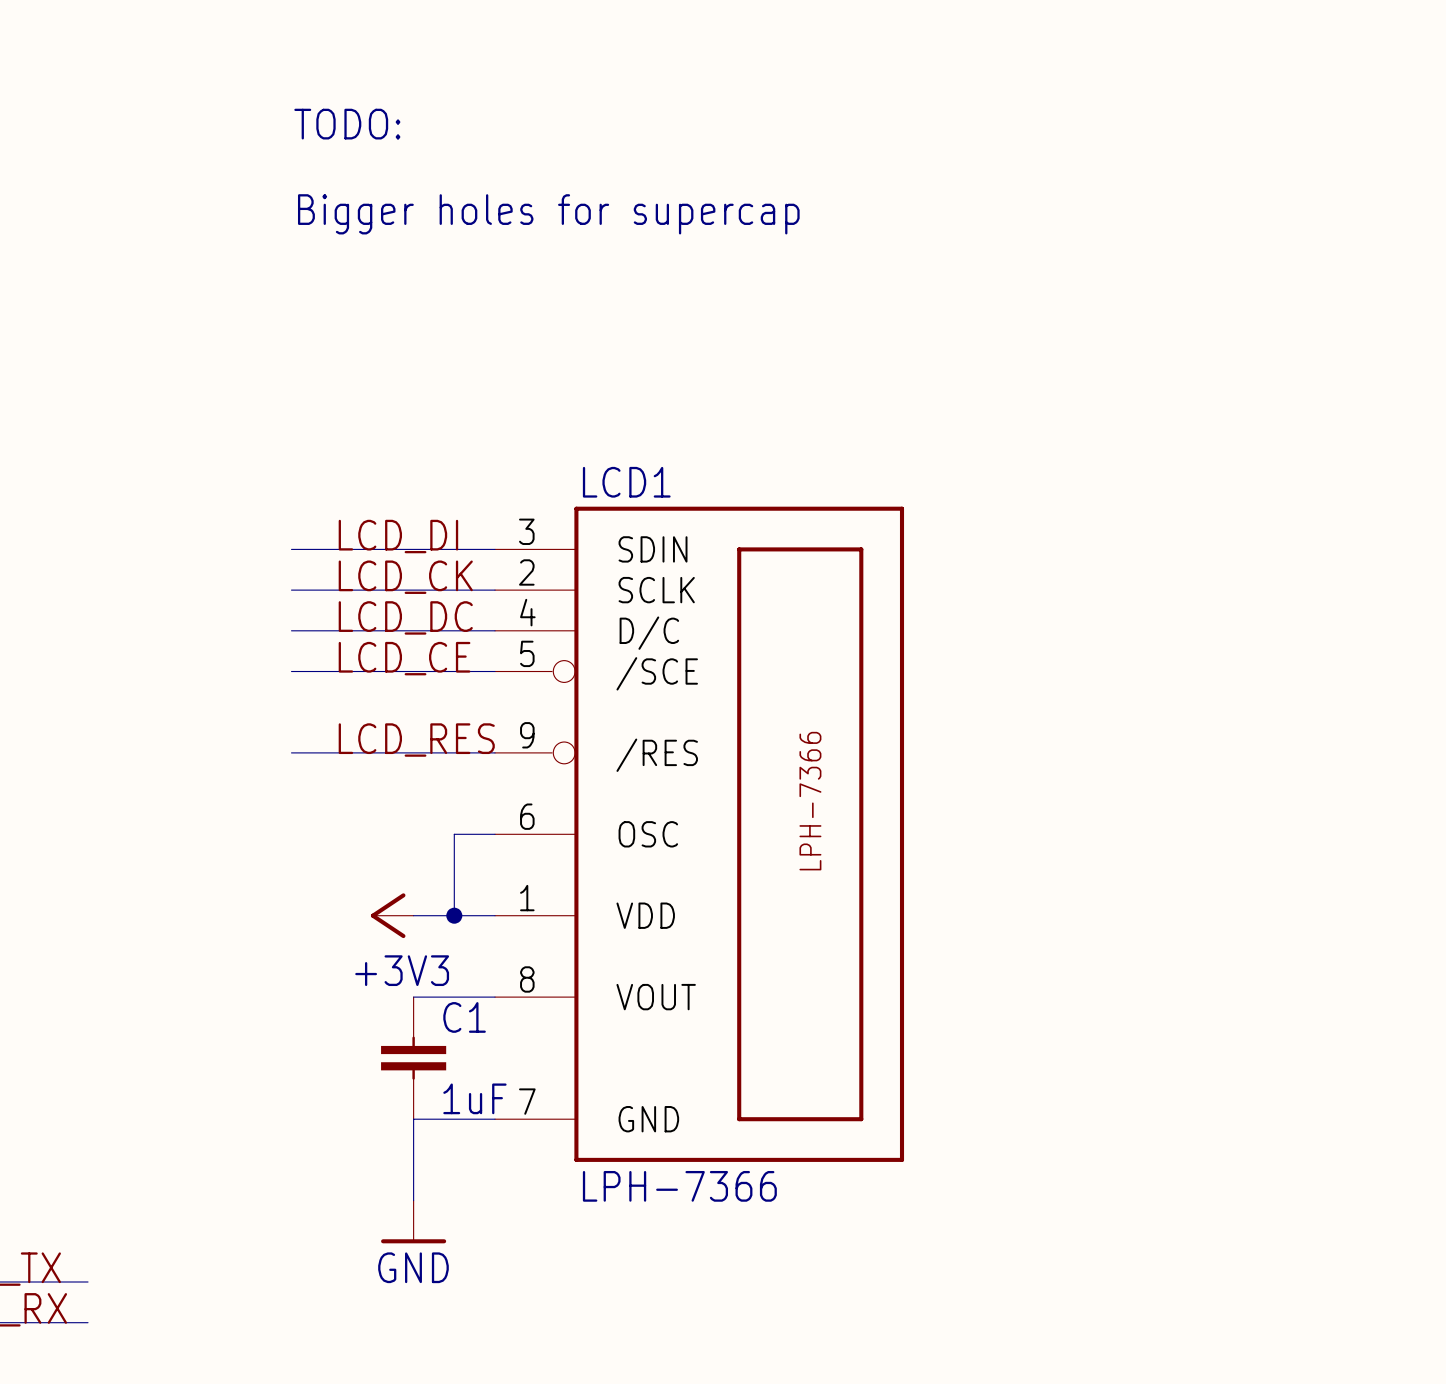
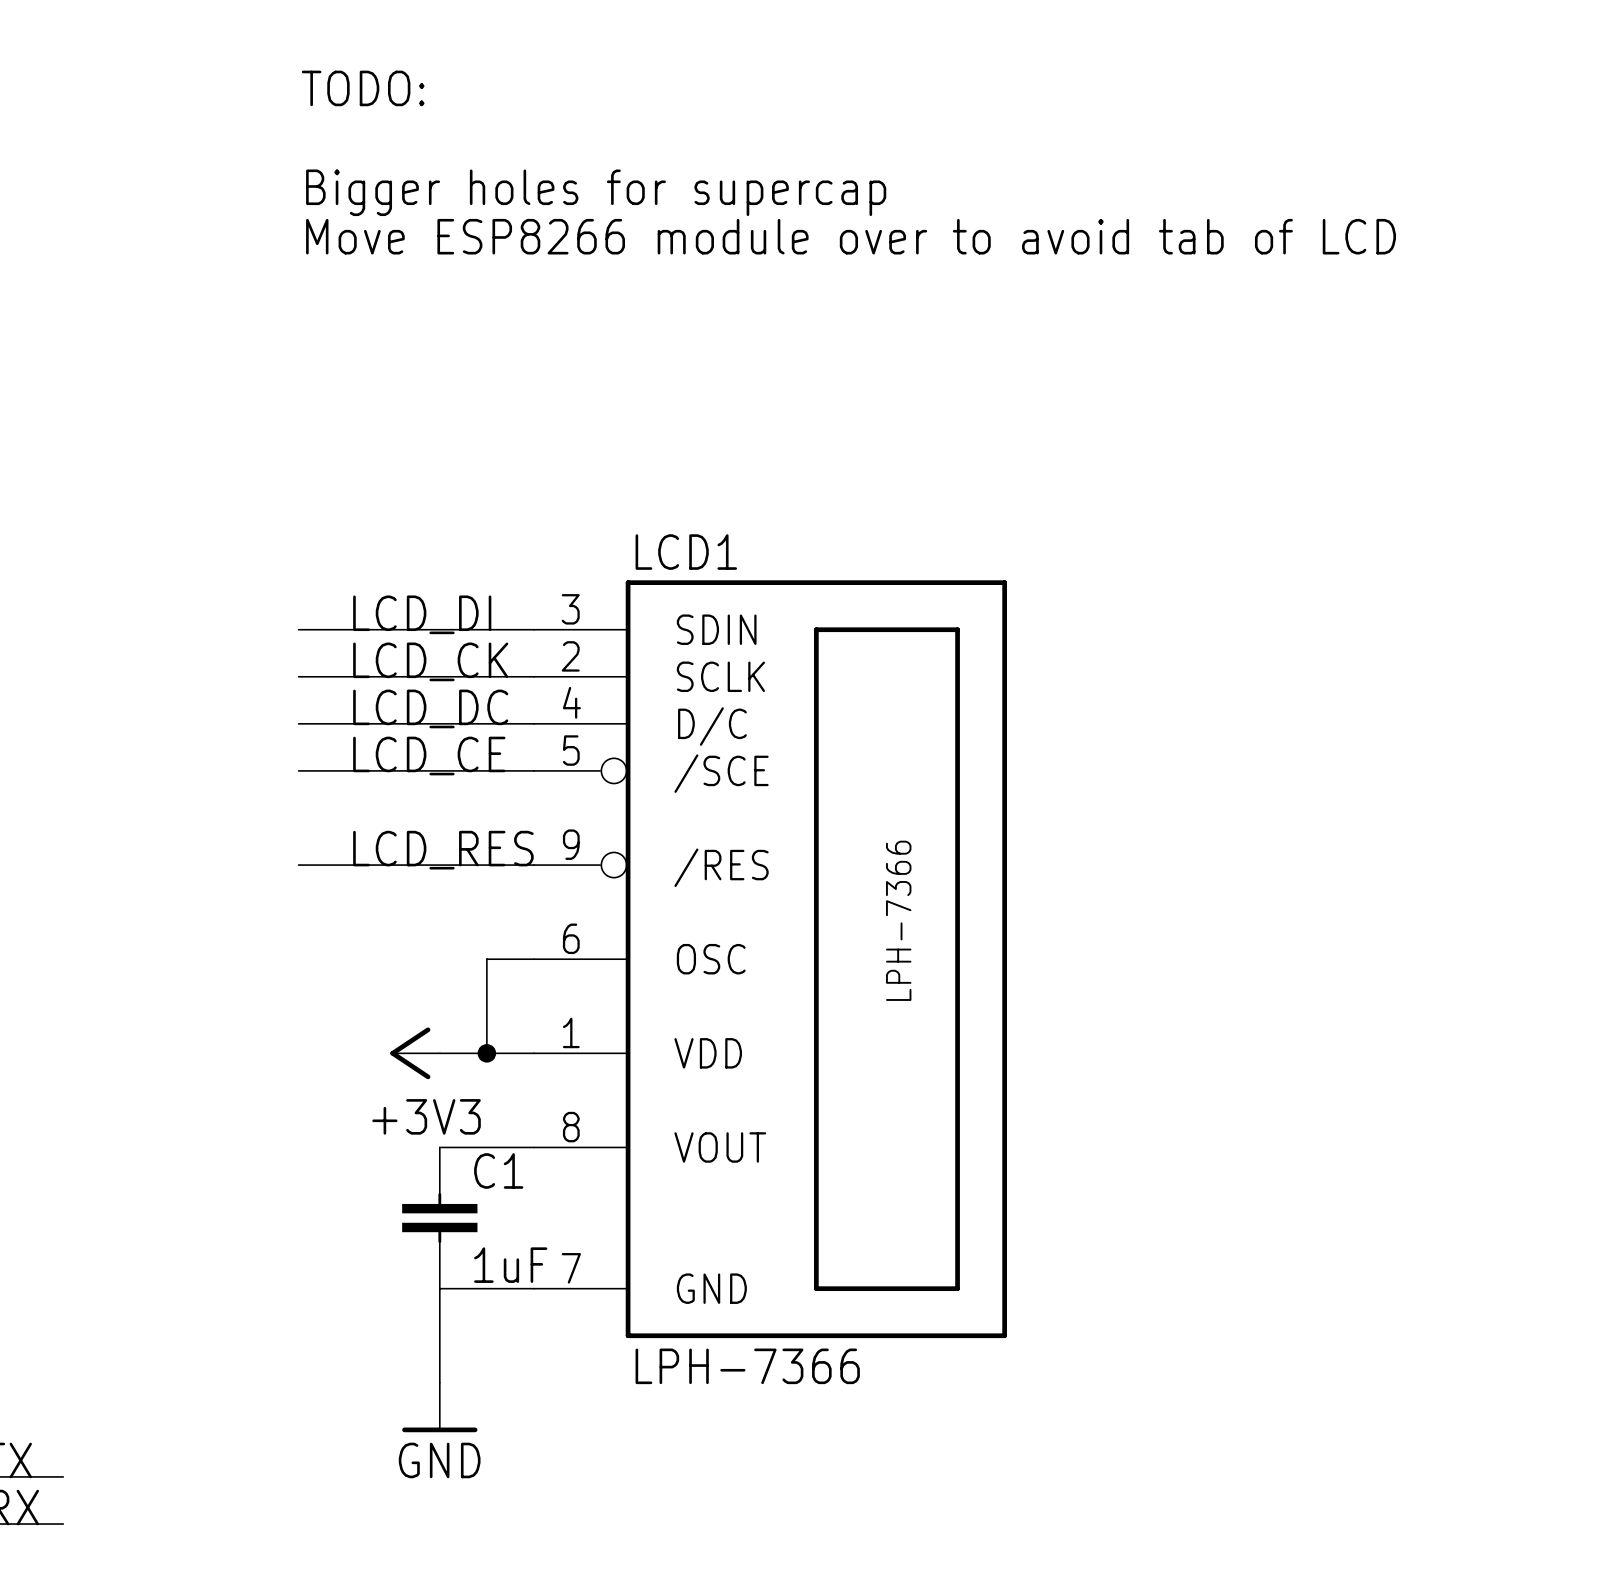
text position: TODO: (347, 124) -> TODO: (363, 88)
text: none -> Bigger holes for supercap (596, 192)
text: Bigger holes for supercap (548, 214) -> Move ESP8266 module over to avoid tab of LCD (851, 236)

